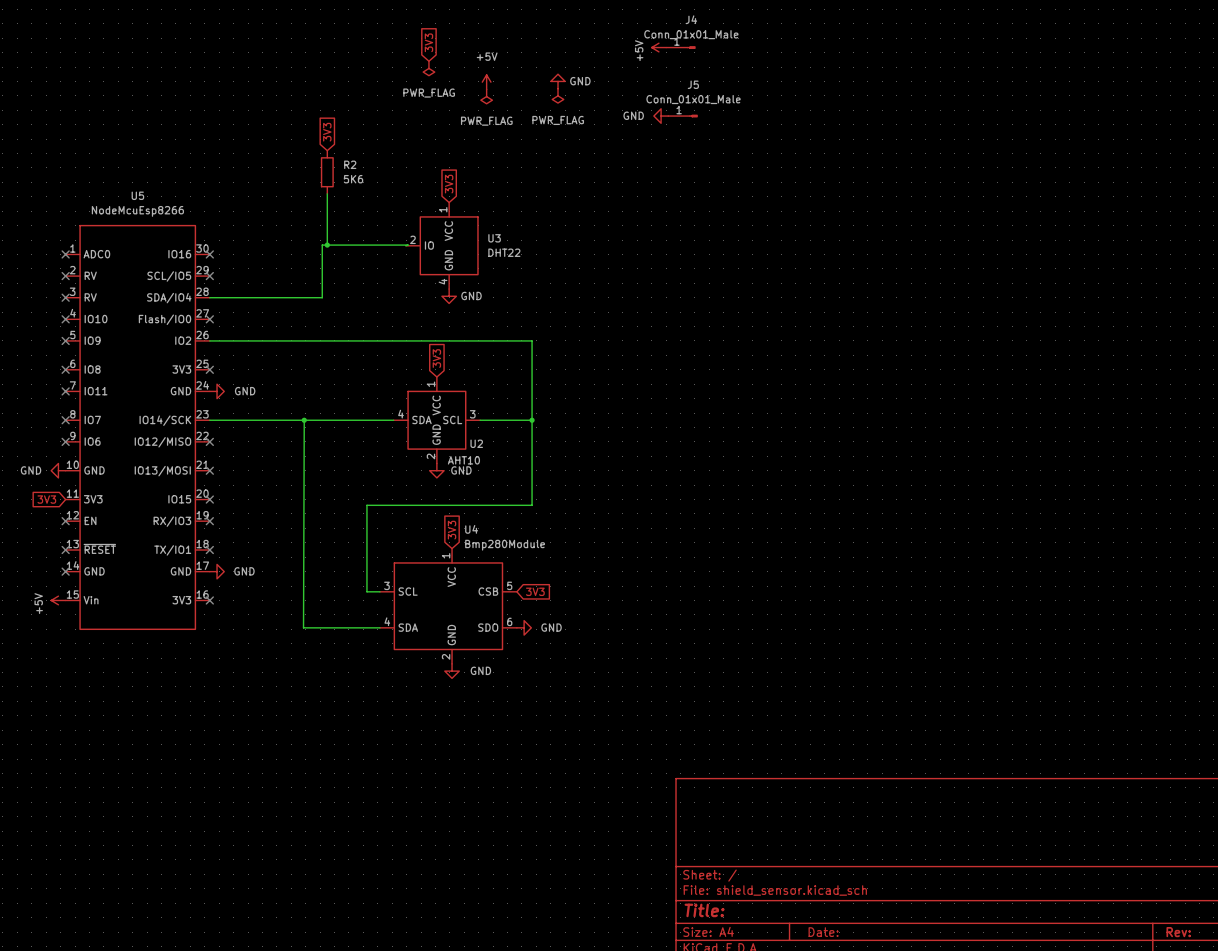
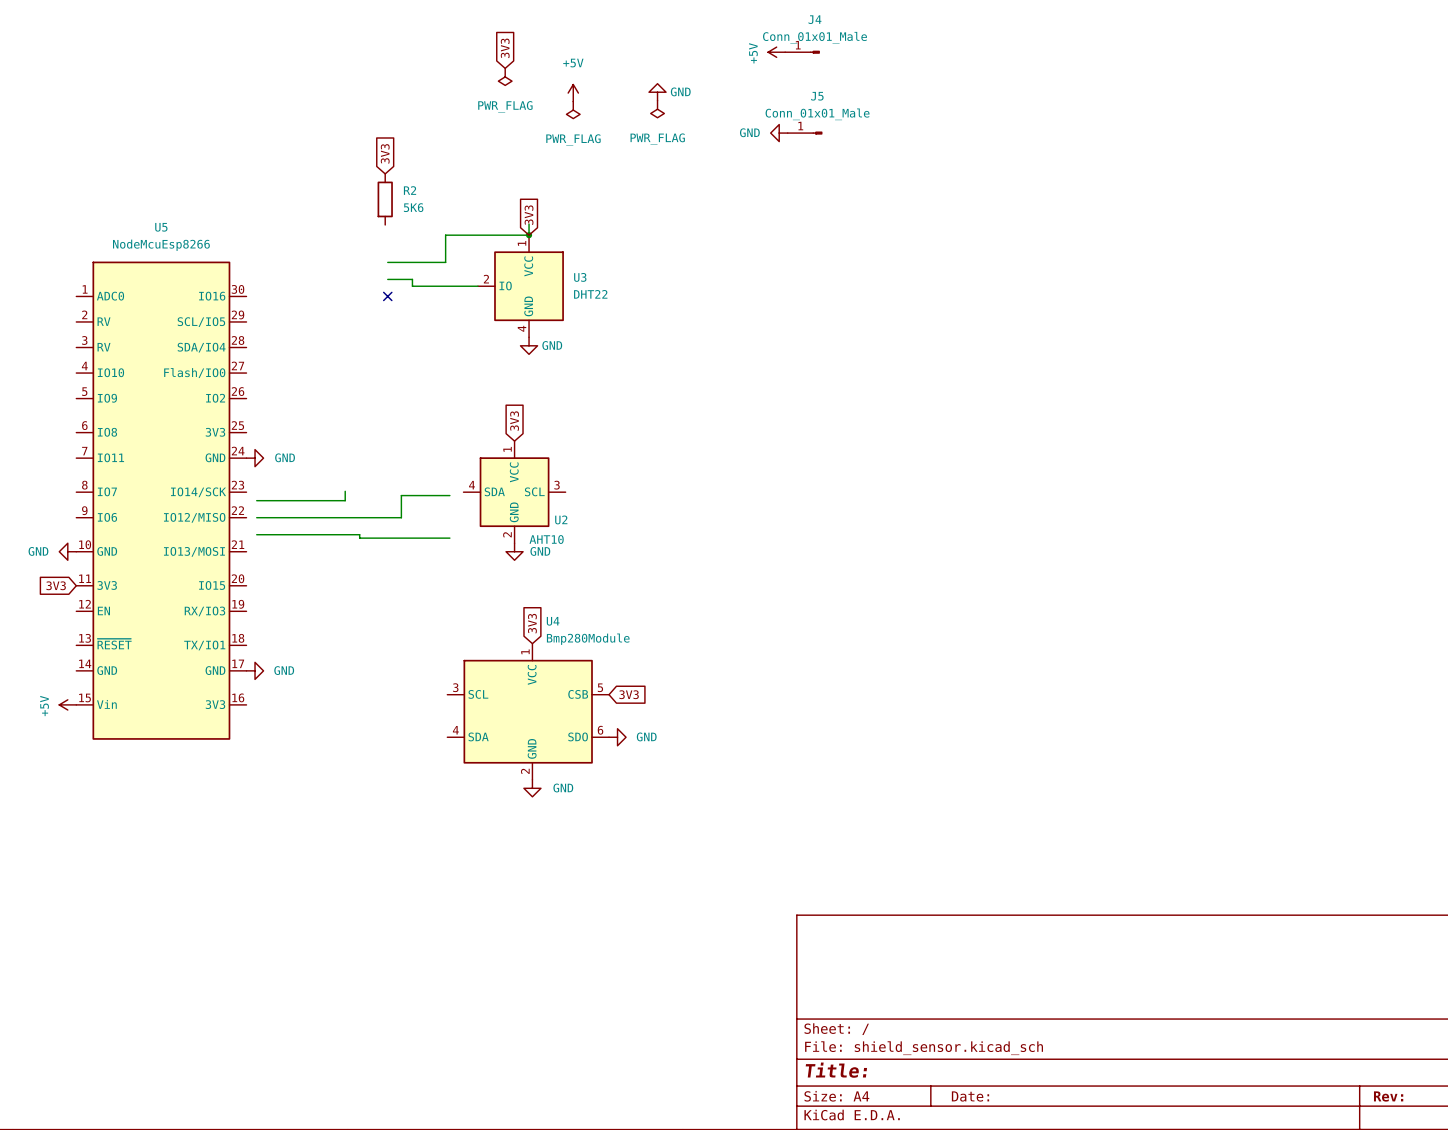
wire: (327, 193) (327, 245) -> none
wire: none -> (529, 224) (529, 235) (445, 235) (445, 262) (387, 262)
junction: none -> (529, 235)
junction: (327, 245) -> none
wire: (405, 245) (408, 245) (322, 245) (322, 297) (209, 297) -> (477, 286) (412, 286) (412, 279) (387, 279)
no-connect mark: (65, 254) -> none
no-connect mark: (209, 254) -> none
no-connect mark: none -> (387, 296)
no-connect mark: (65, 276) -> none
no-connect mark: (209, 276) -> none
no-connect mark: (65, 297) -> none
no-connect mark: (65, 319) -> none
no-connect mark: (209, 319) -> none
no-connect mark: (65, 340) -> none
wire: (209, 340) (532, 340) (532, 505) (366, 505) (366, 591) (379, 591) -> none
no-connect mark: (65, 369) -> none
no-connect mark: (209, 369) -> none
no-connect mark: (65, 391) -> none
wire: none -> (345, 491) (345, 500) (256, 500)
no-connect mark: (65, 420) -> none
wire: (209, 420) (393, 420) -> none
wire: (304, 420) (303, 627) (379, 627) -> none
junction: (304, 420) -> none
wire: (480, 420) (532, 420) -> none
junction: (532, 420) -> none
wire: none -> (449, 495) (401, 495) (401, 517) (256, 517)
no-connect mark: (65, 441) -> none
no-connect mark: (209, 441) -> none
wire: none -> (256, 534) (359, 534) (359, 538) (449, 538)
no-connect mark: (209, 470) -> none
no-connect mark: (209, 499) -> none
no-connect mark: (65, 521) -> none
no-connect mark: (209, 521) -> none
no-connect mark: (65, 550) -> none
no-connect mark: (209, 550) -> none
no-connect mark: (65, 571) -> none
no-connect mark: (209, 600) -> none

